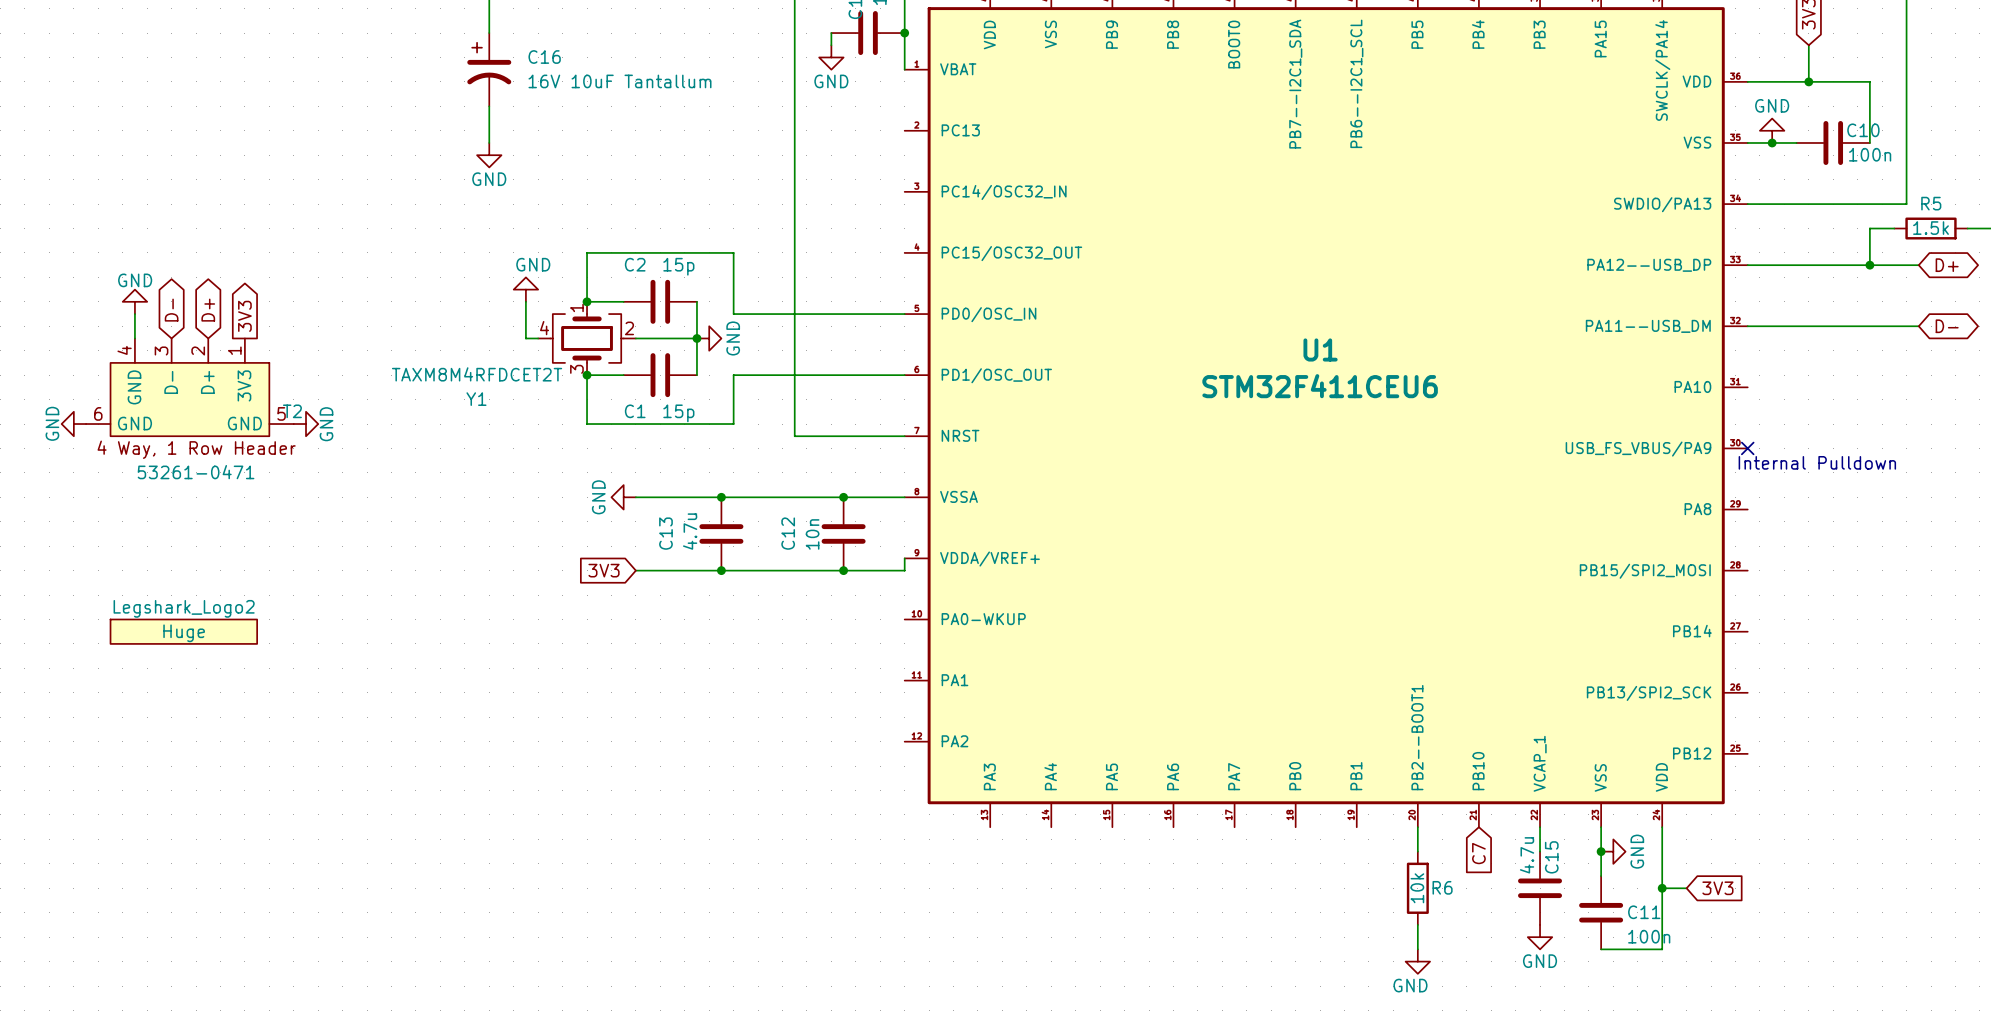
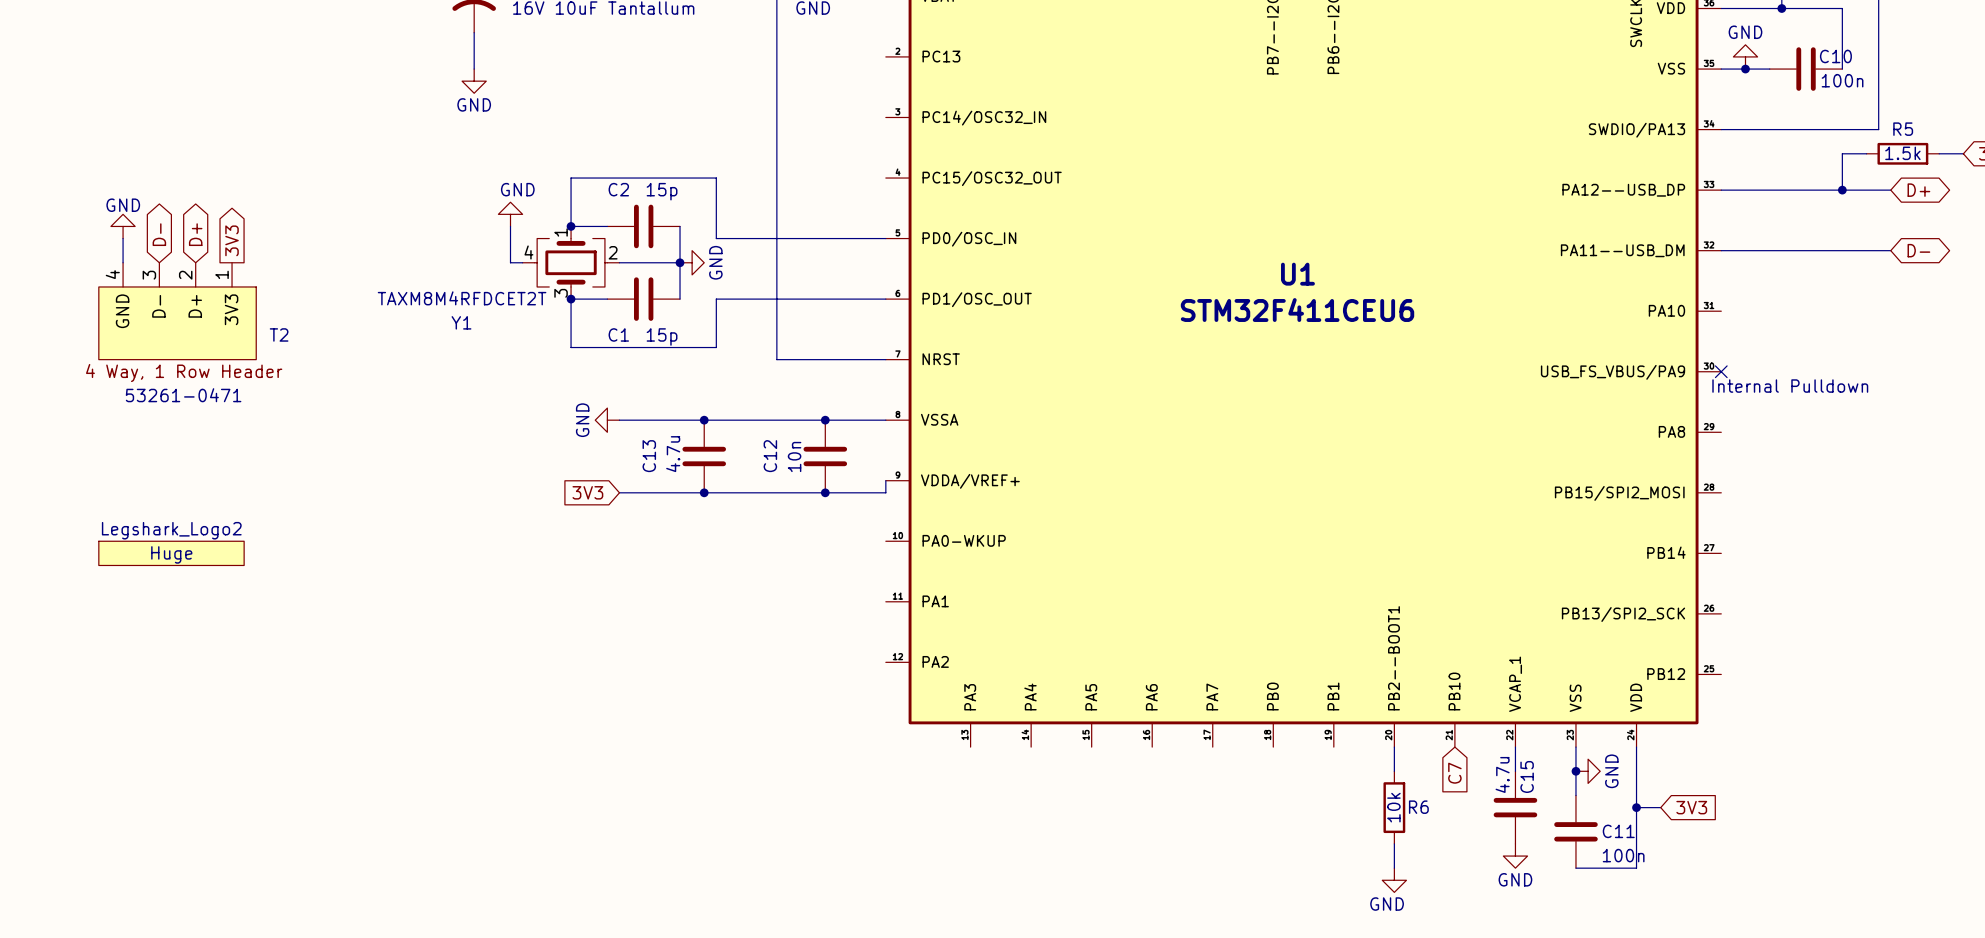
T2 symbol: [86, 338, 294, 437] -> [98, 262, 257, 360]
power symbol: GND (73, 424) -> none
power symbol: GND (306, 424) -> none

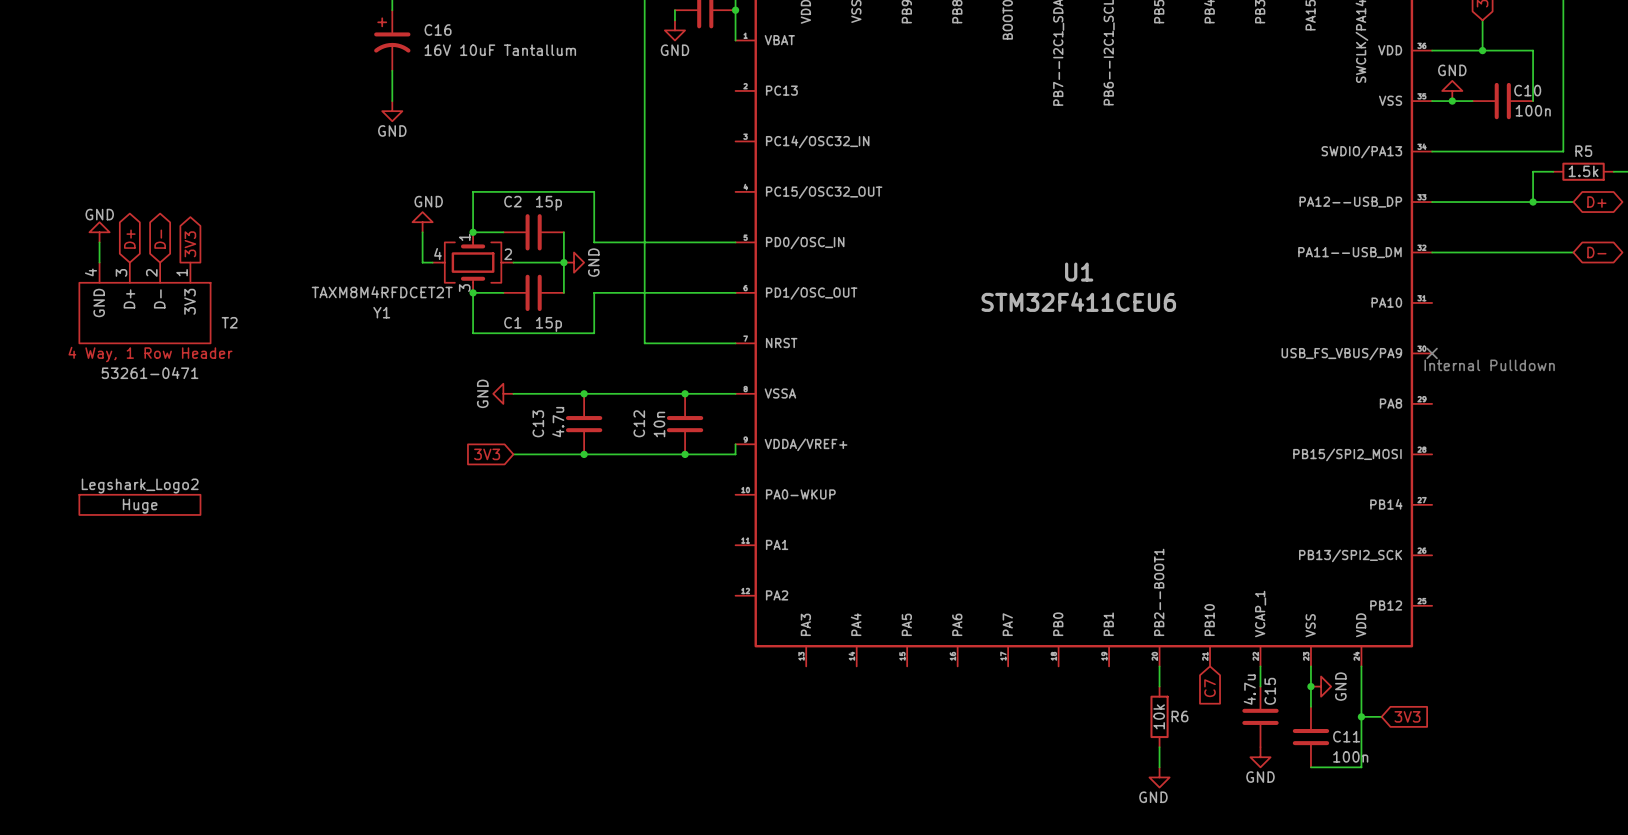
global label: D- (159, 234) -> D+ (129, 239)
global label: D+ (195, 234) -> D- (160, 239)
T2 pin name: D- (158, 306) -> D+ (129, 298)
T2 pin name: D+ (195, 306) -> D- (159, 298)

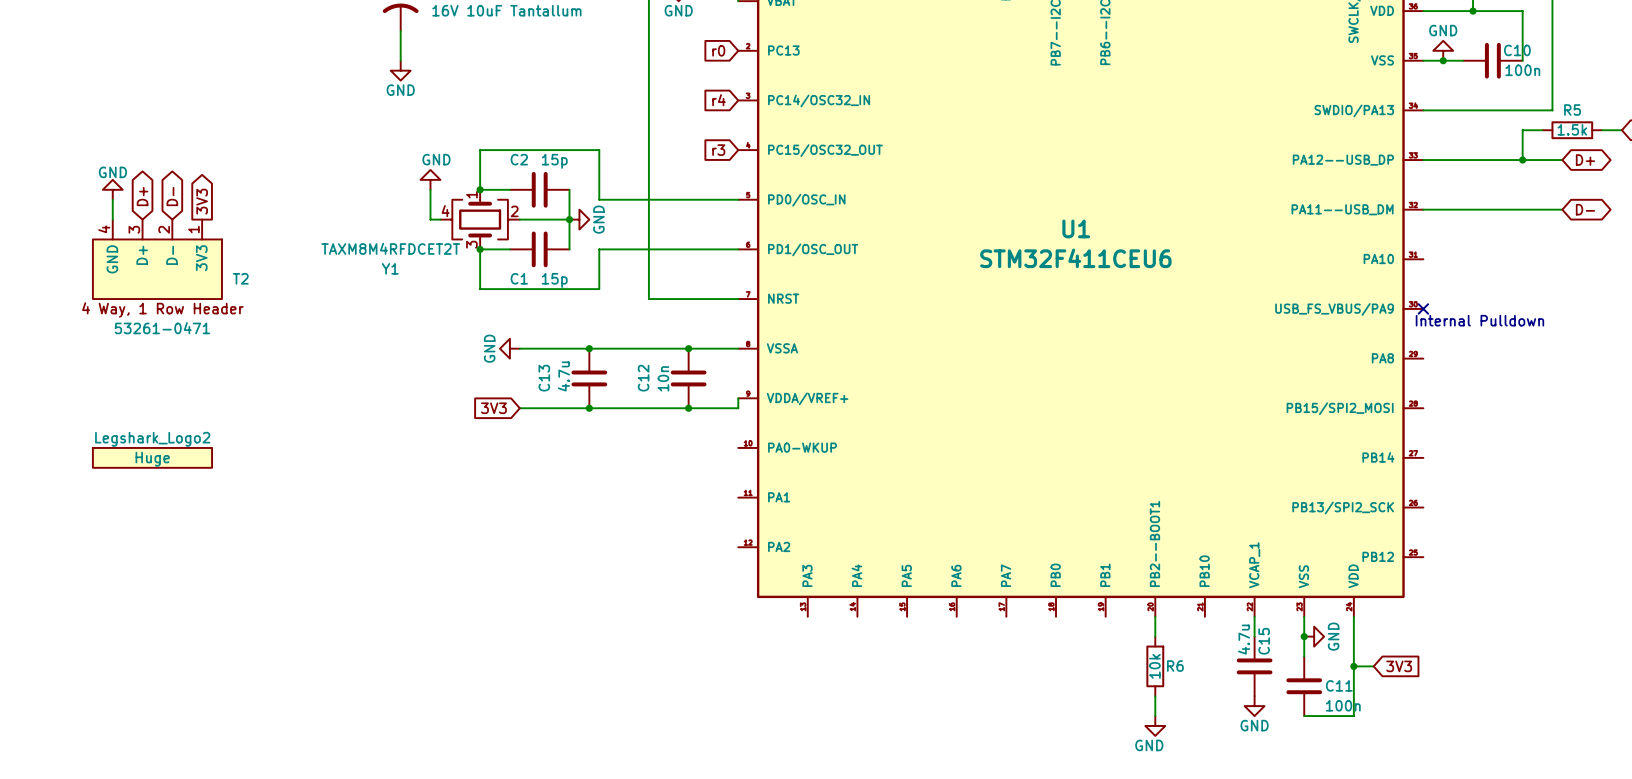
global label: none -> r0 (718, 50)
global label: none -> r4 (719, 100)
global label: none -> r3 (718, 150)
global label: C7 (1210, 688) -> none

